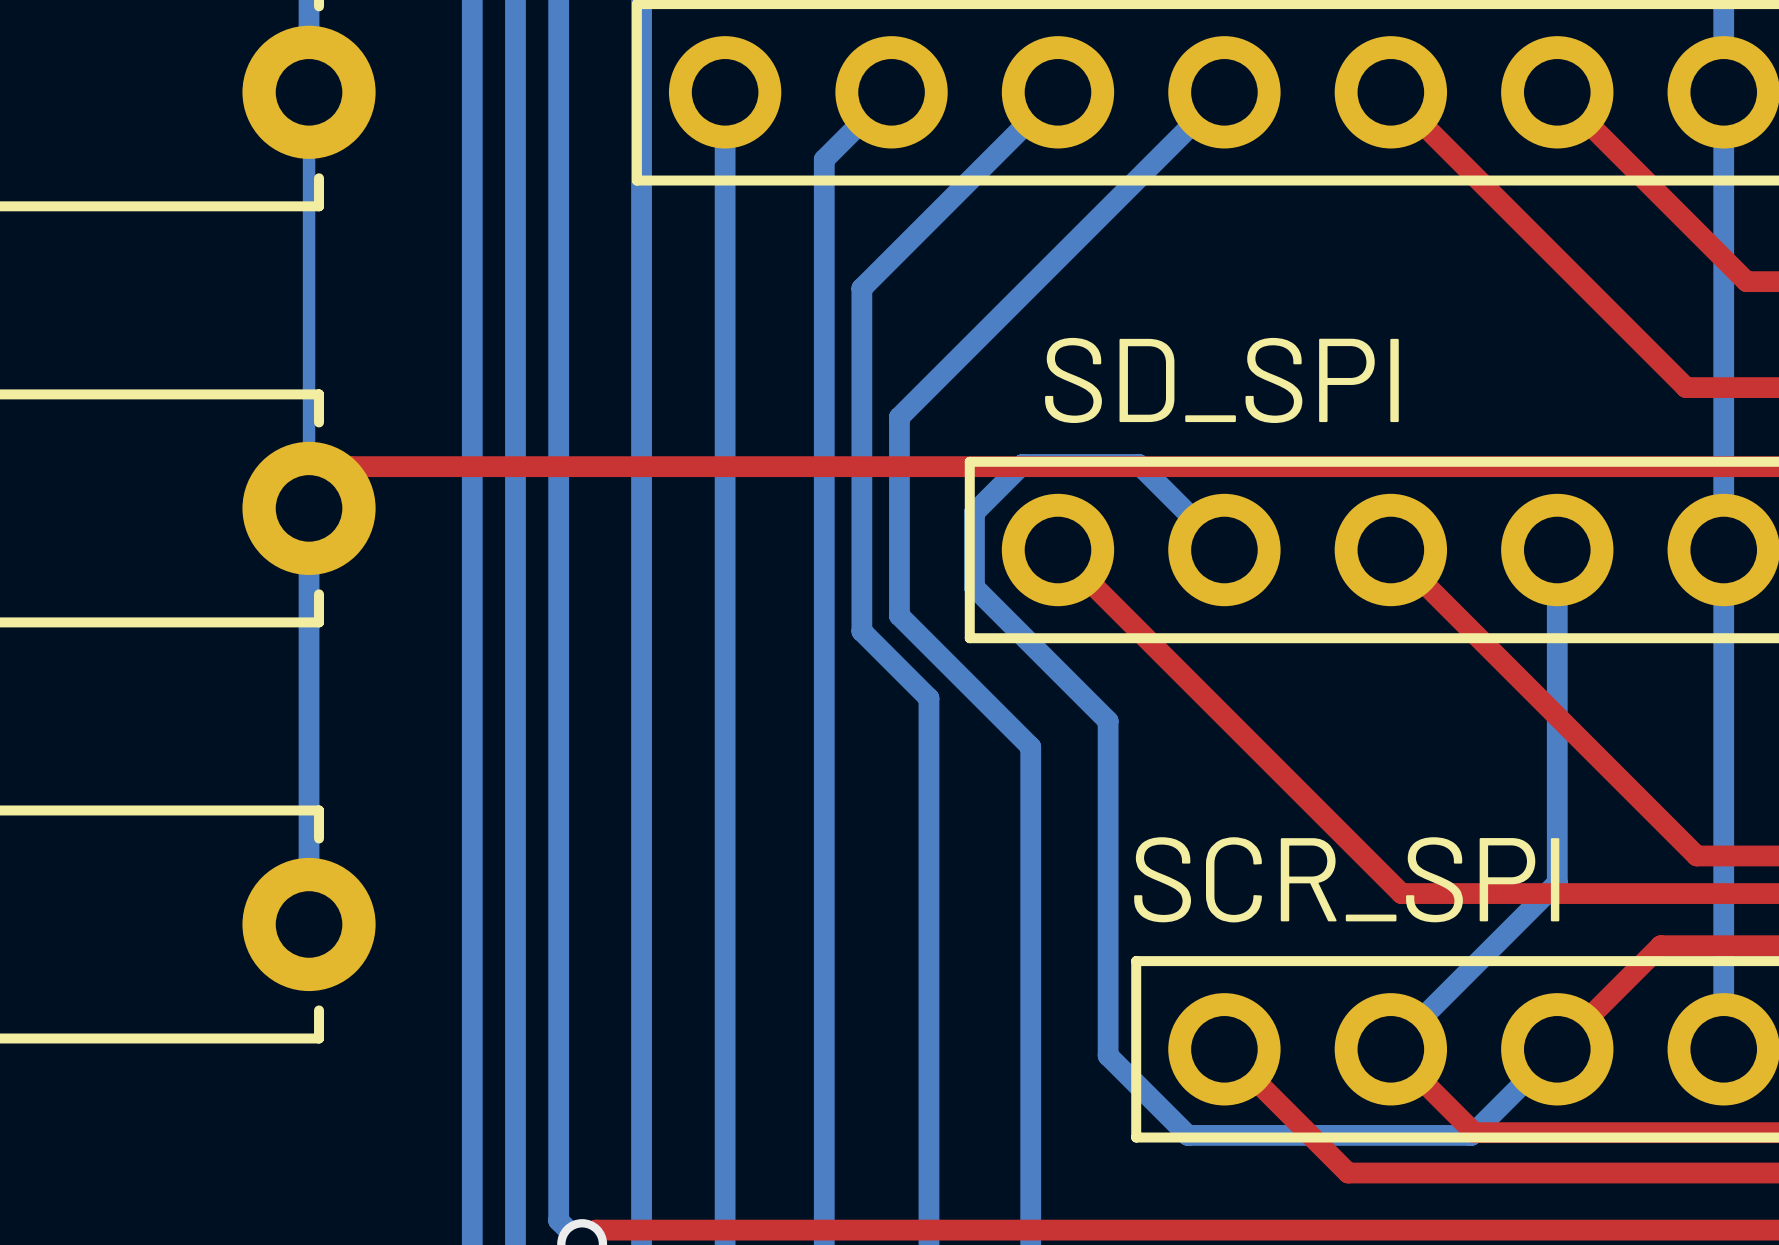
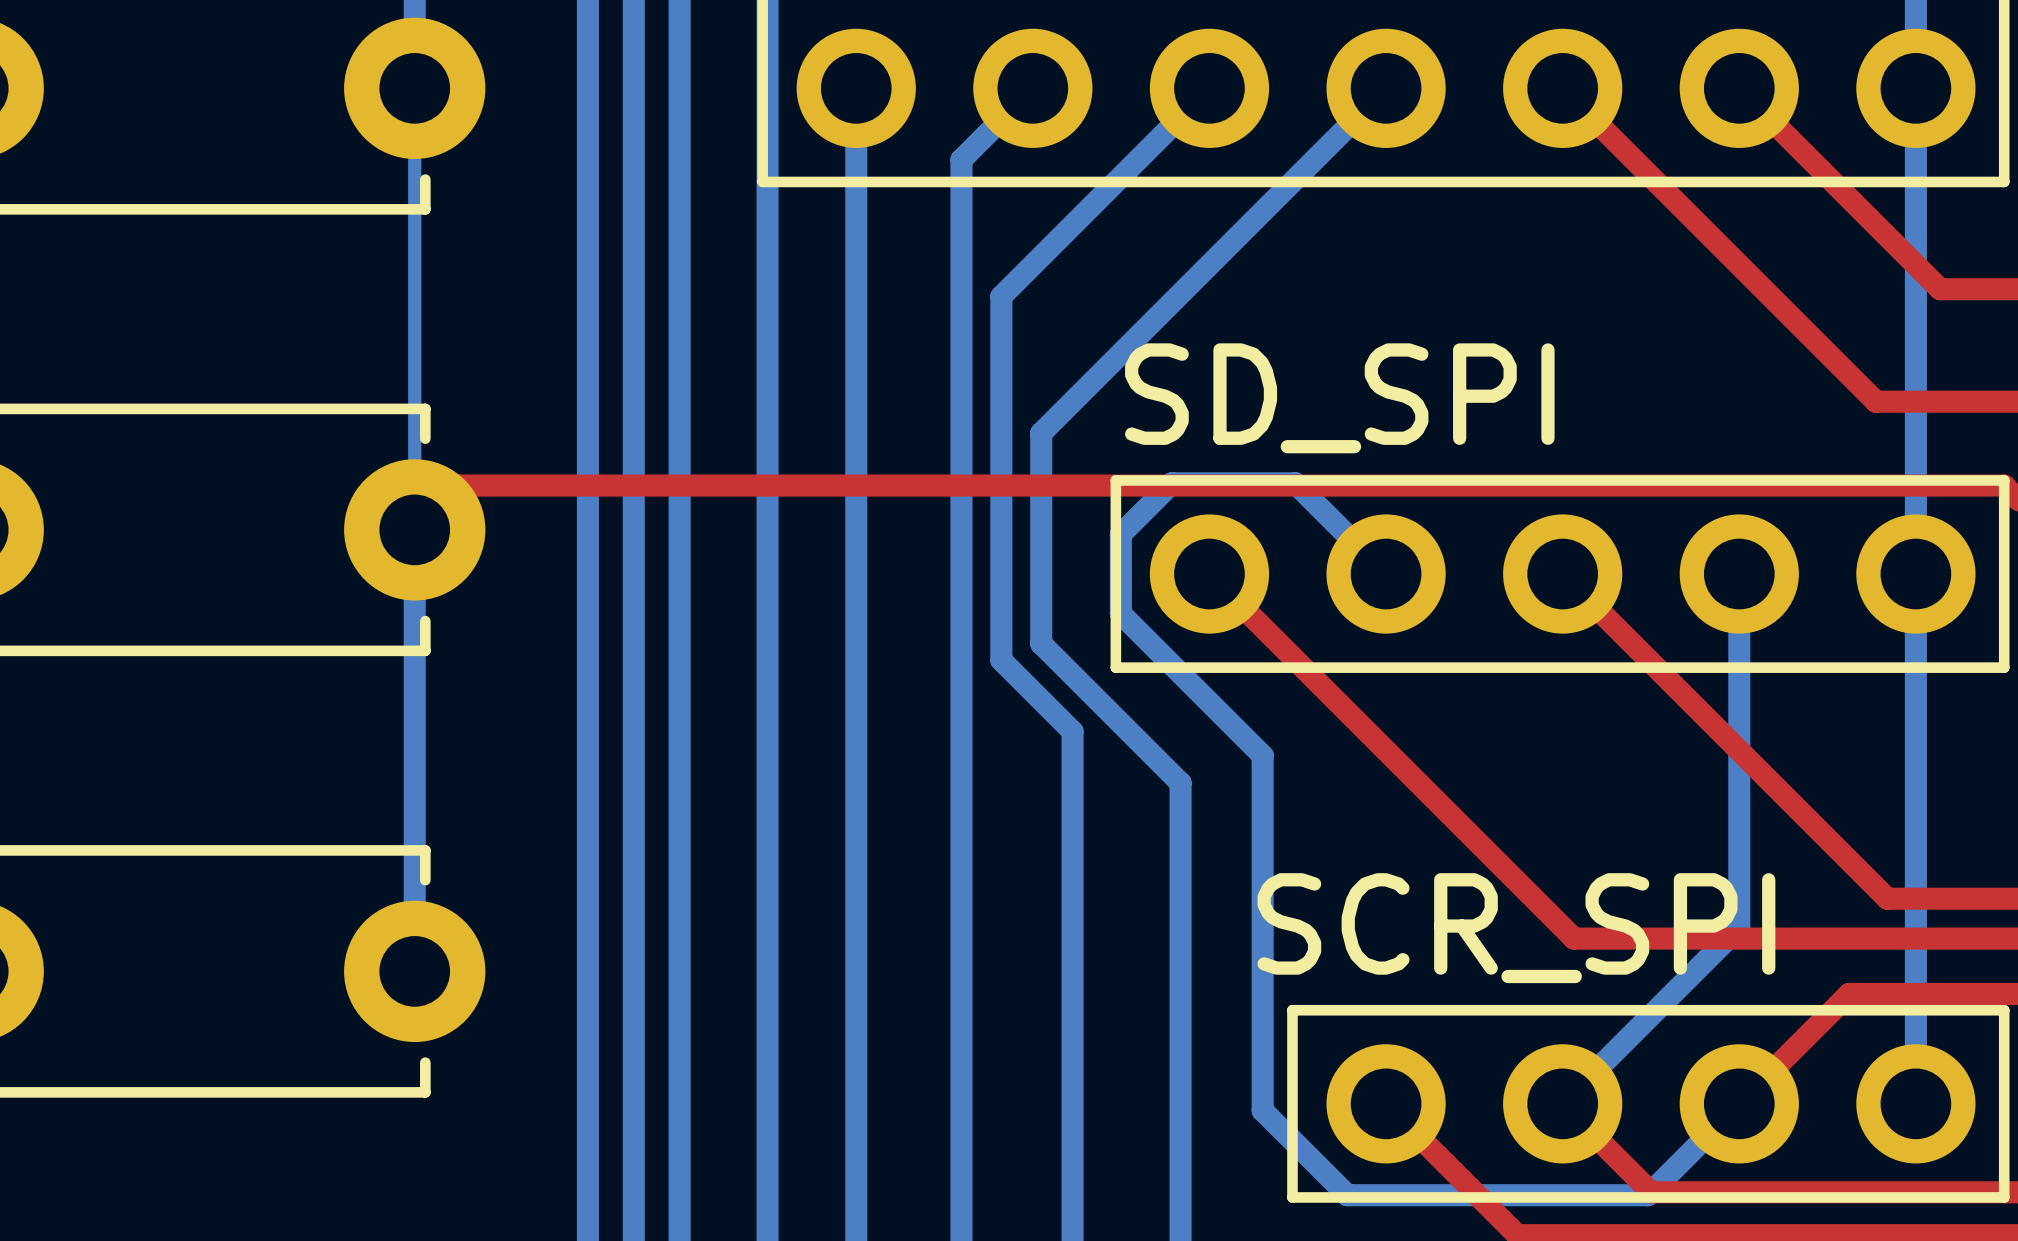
part value position: SD_SPI (1221, 380) -> SD_SPI (1339, 398)

